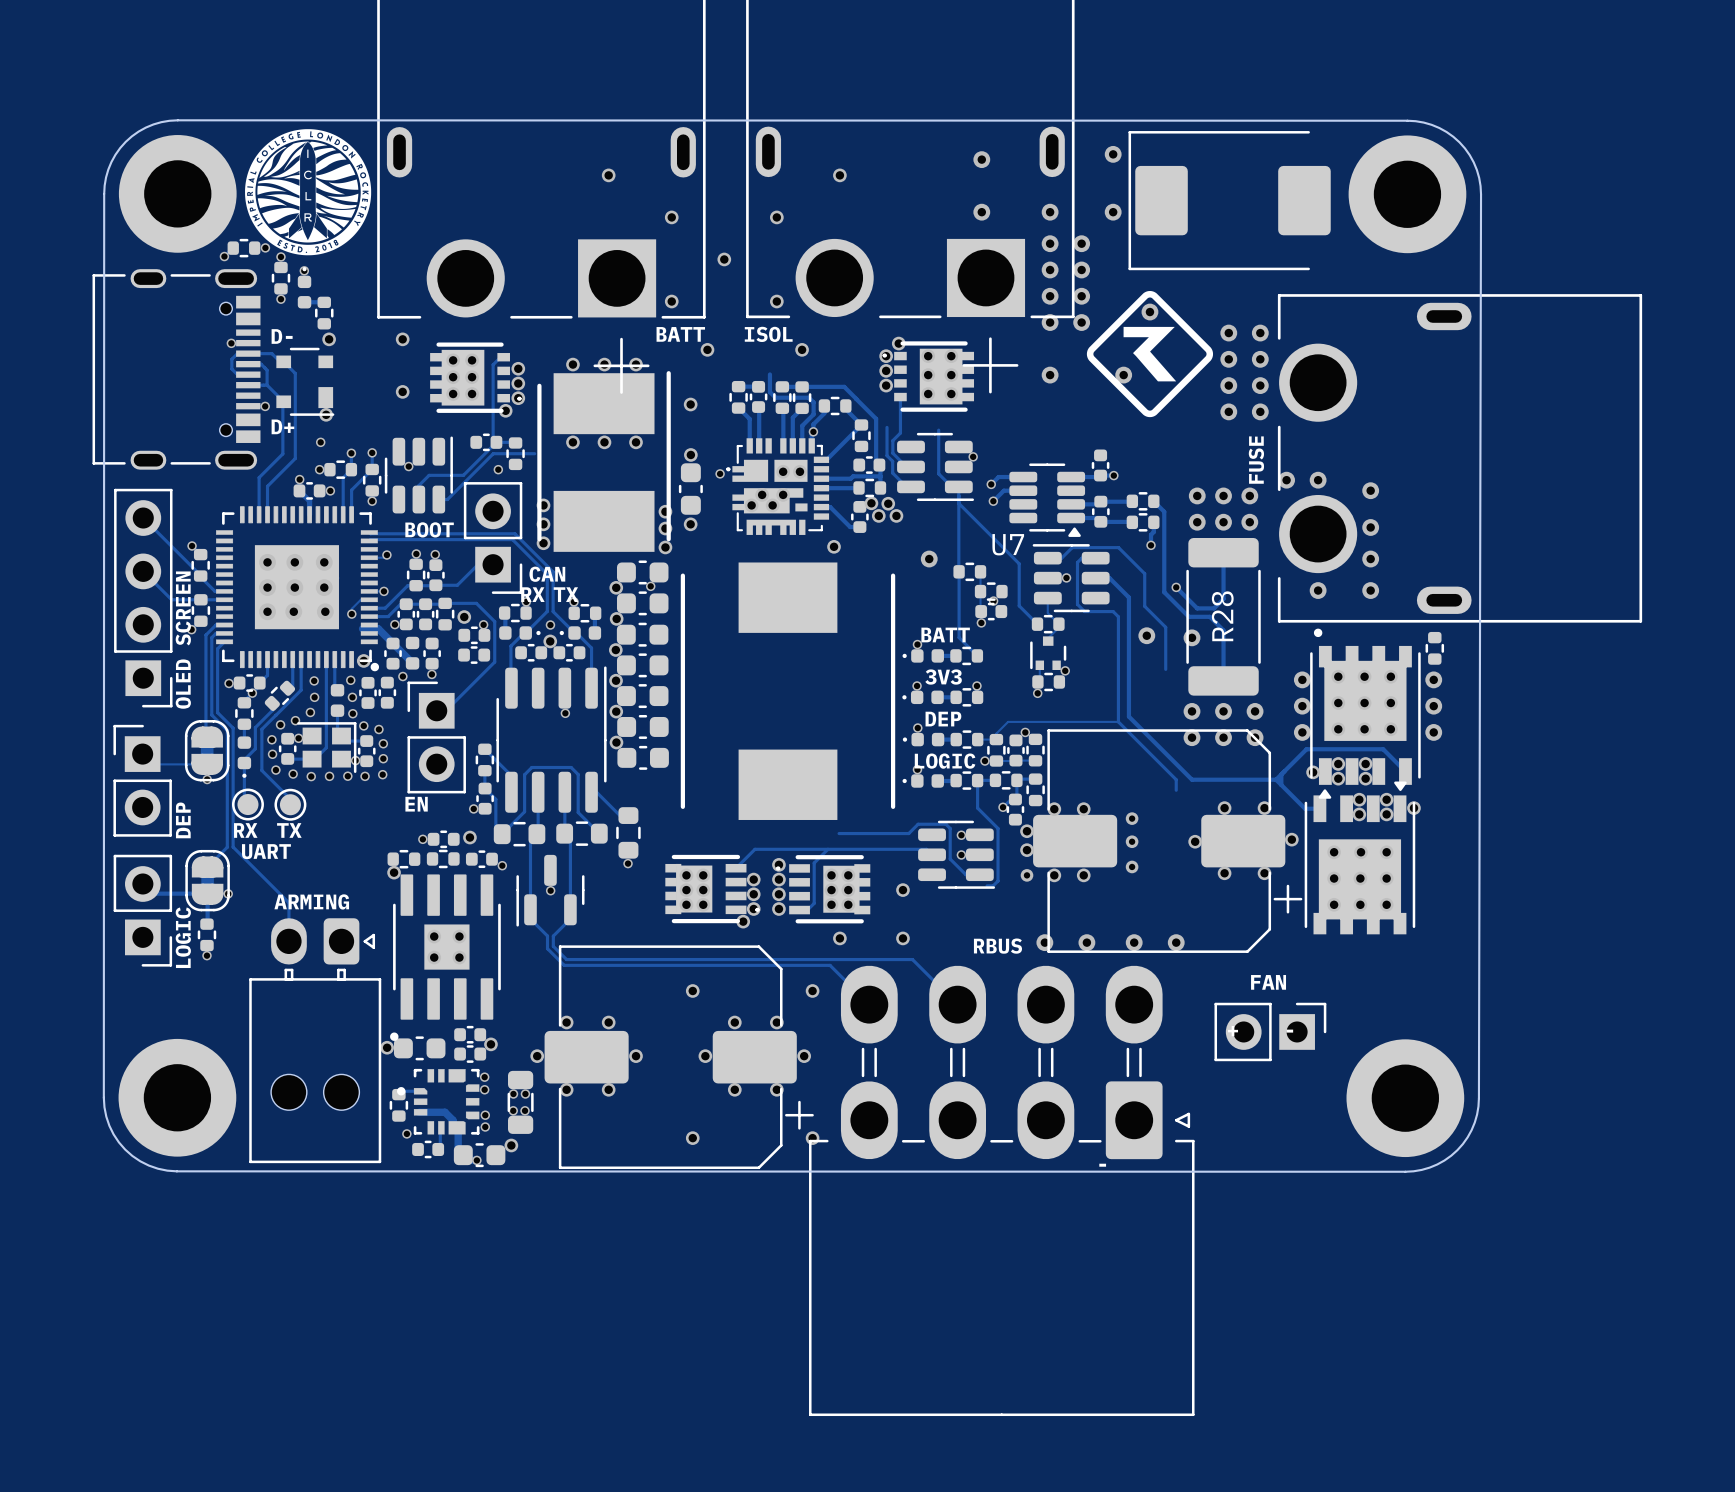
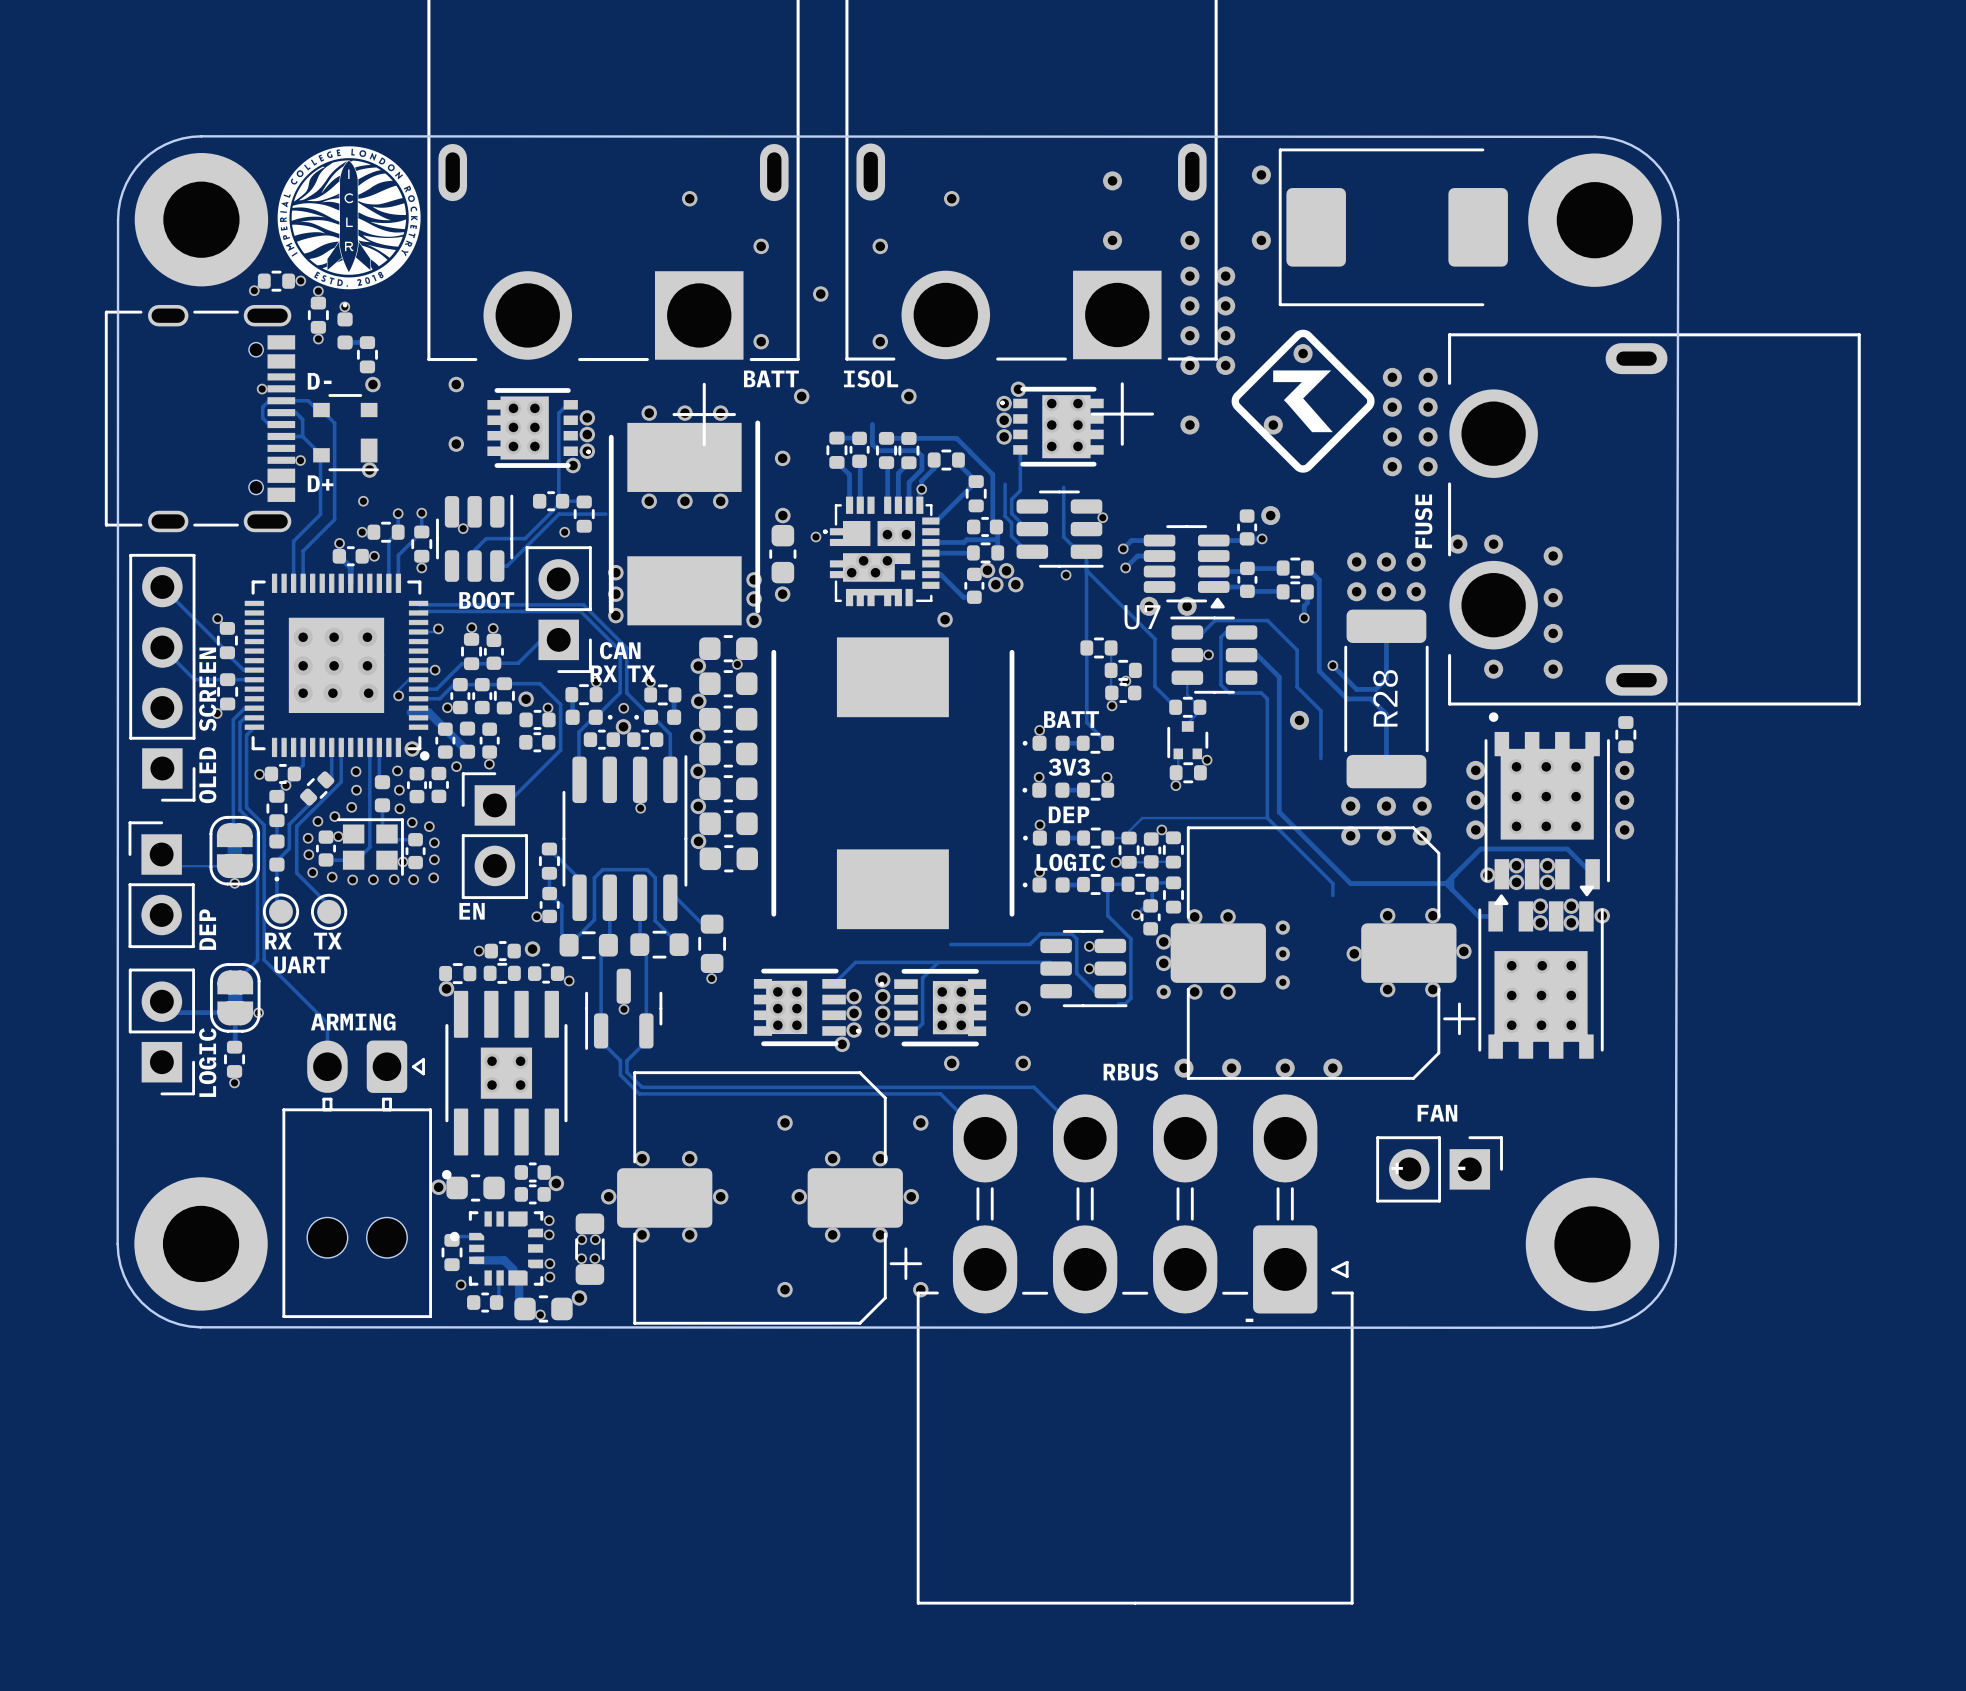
via: none -> (1270, 515)
via: none -> (1066, 575)
via: none -> (1149, 606)
via: none -> (1187, 606)
via: (929, 559) -> none
via: (1192, 637) -> none

